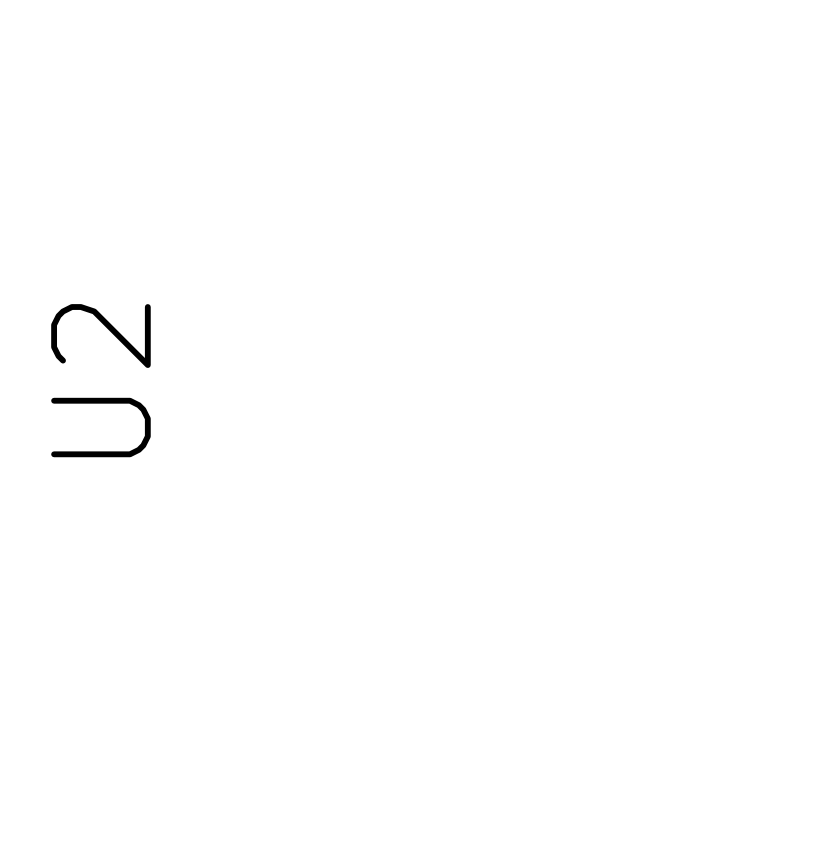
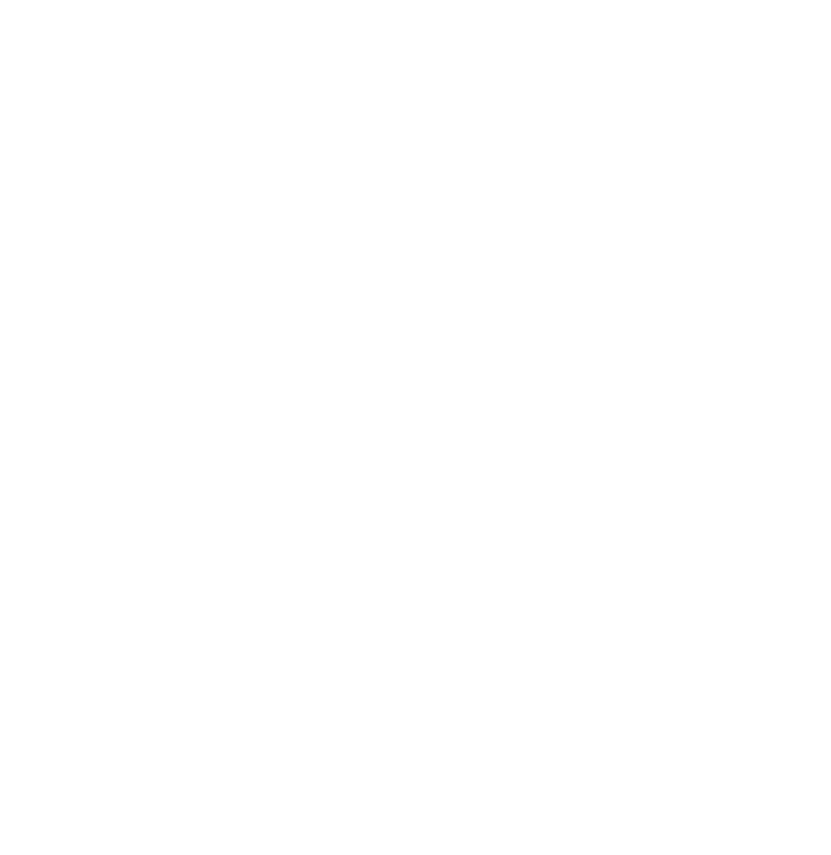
U2 name: U2 (100, 380) -> none

